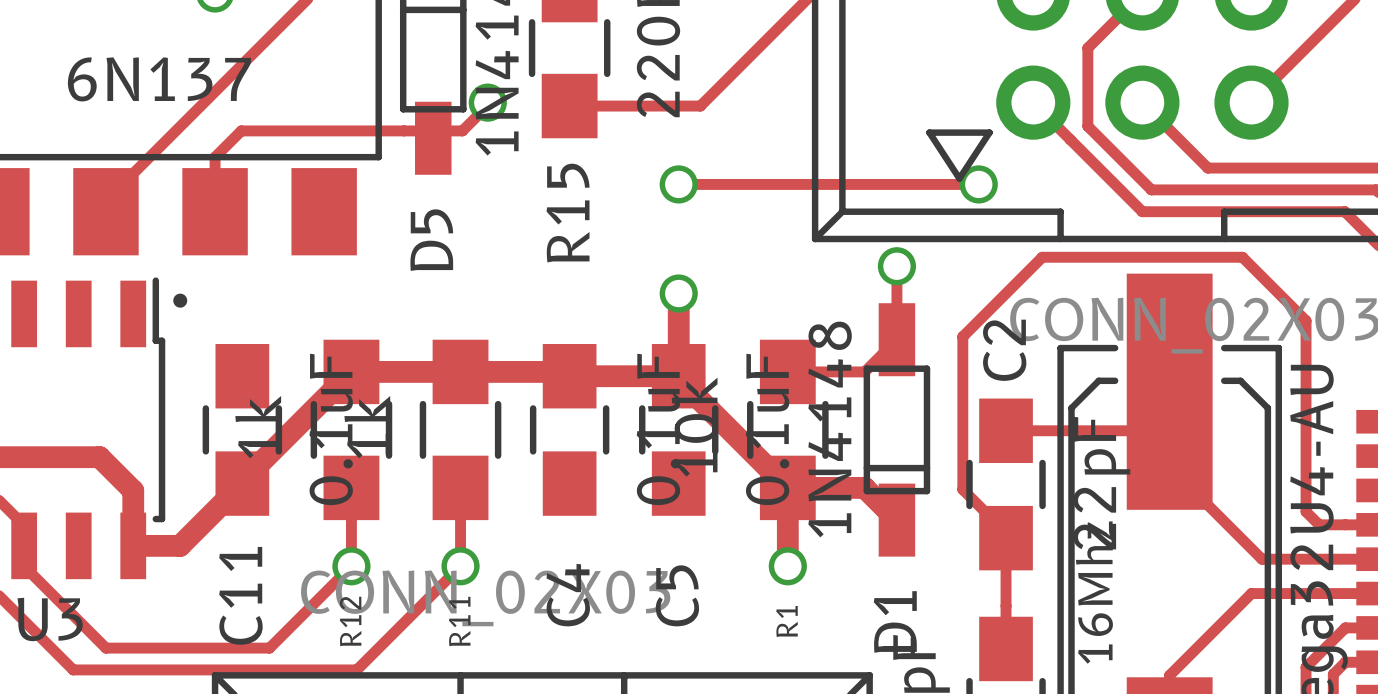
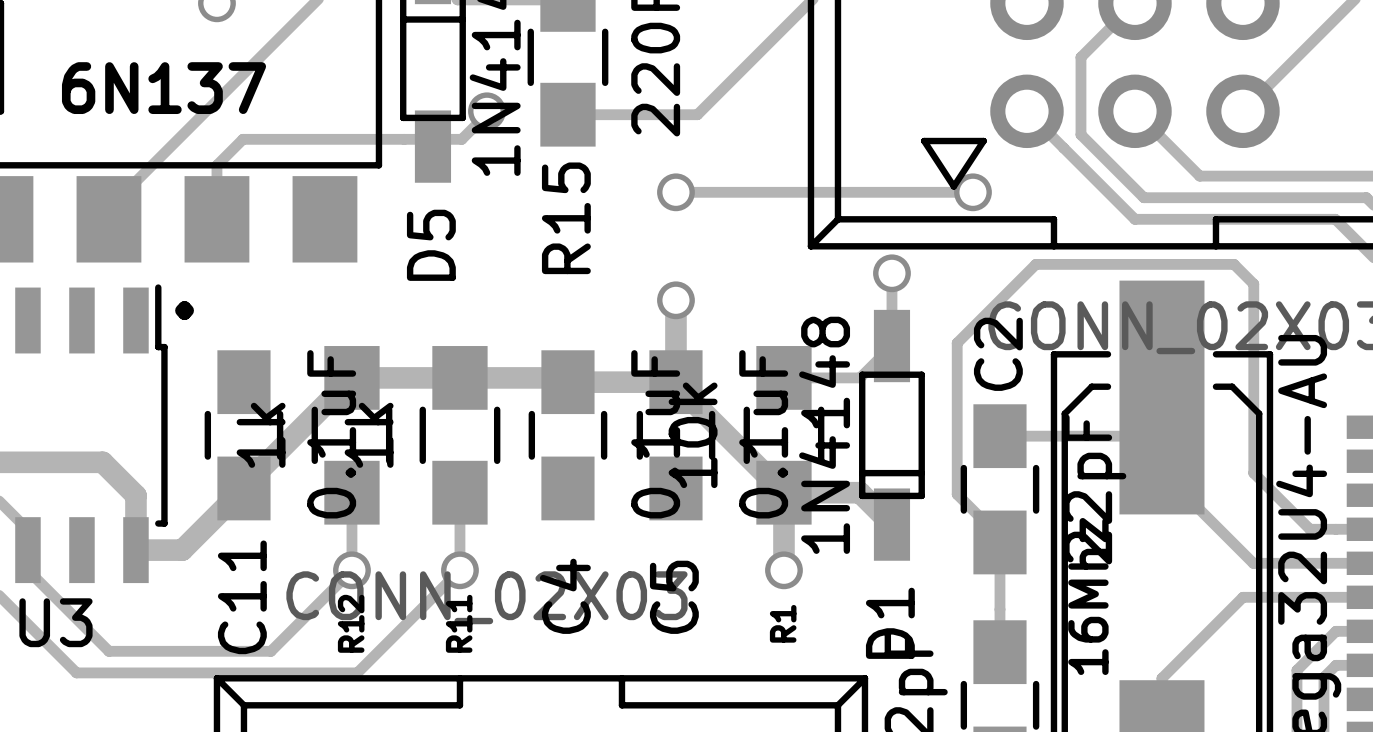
track: (1262, 277) (1306, 320) (1306, 511) -> (1253, 284) (1253, 473) (1296, 516)

